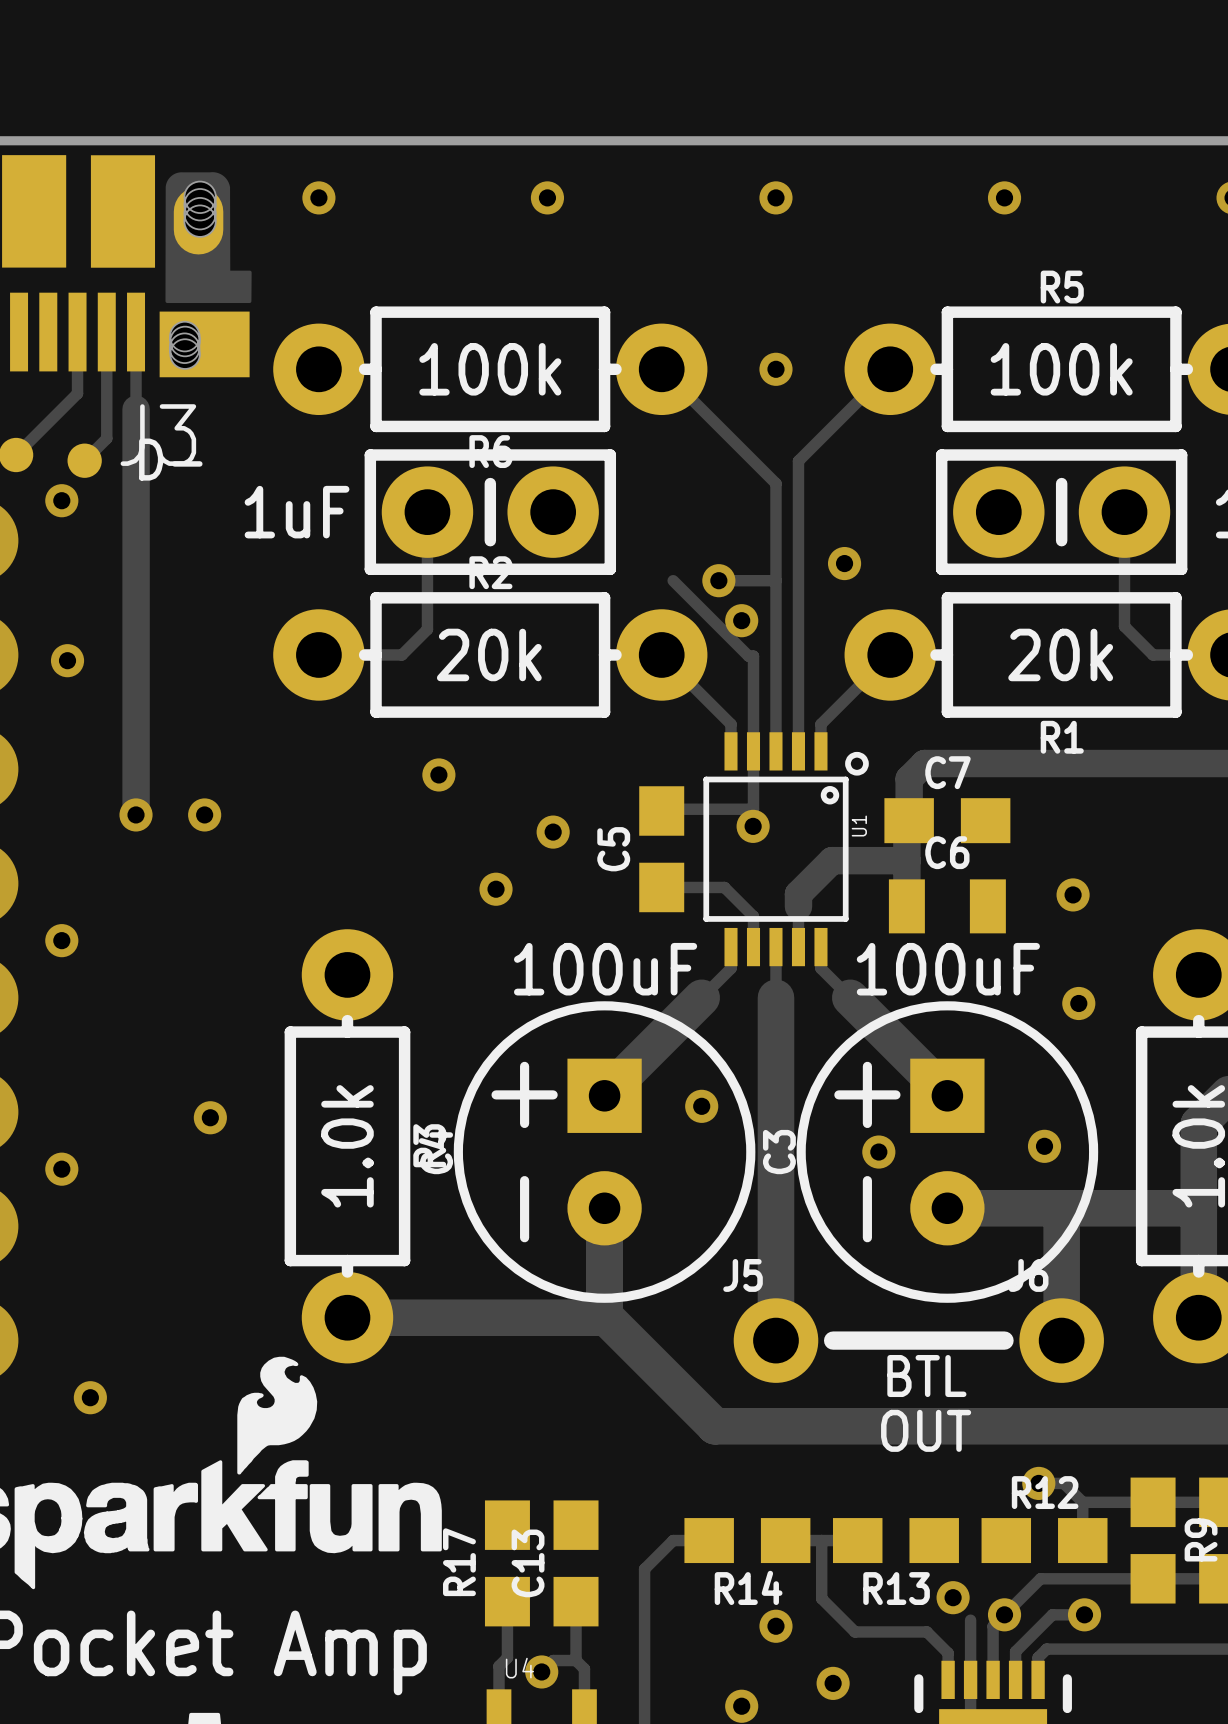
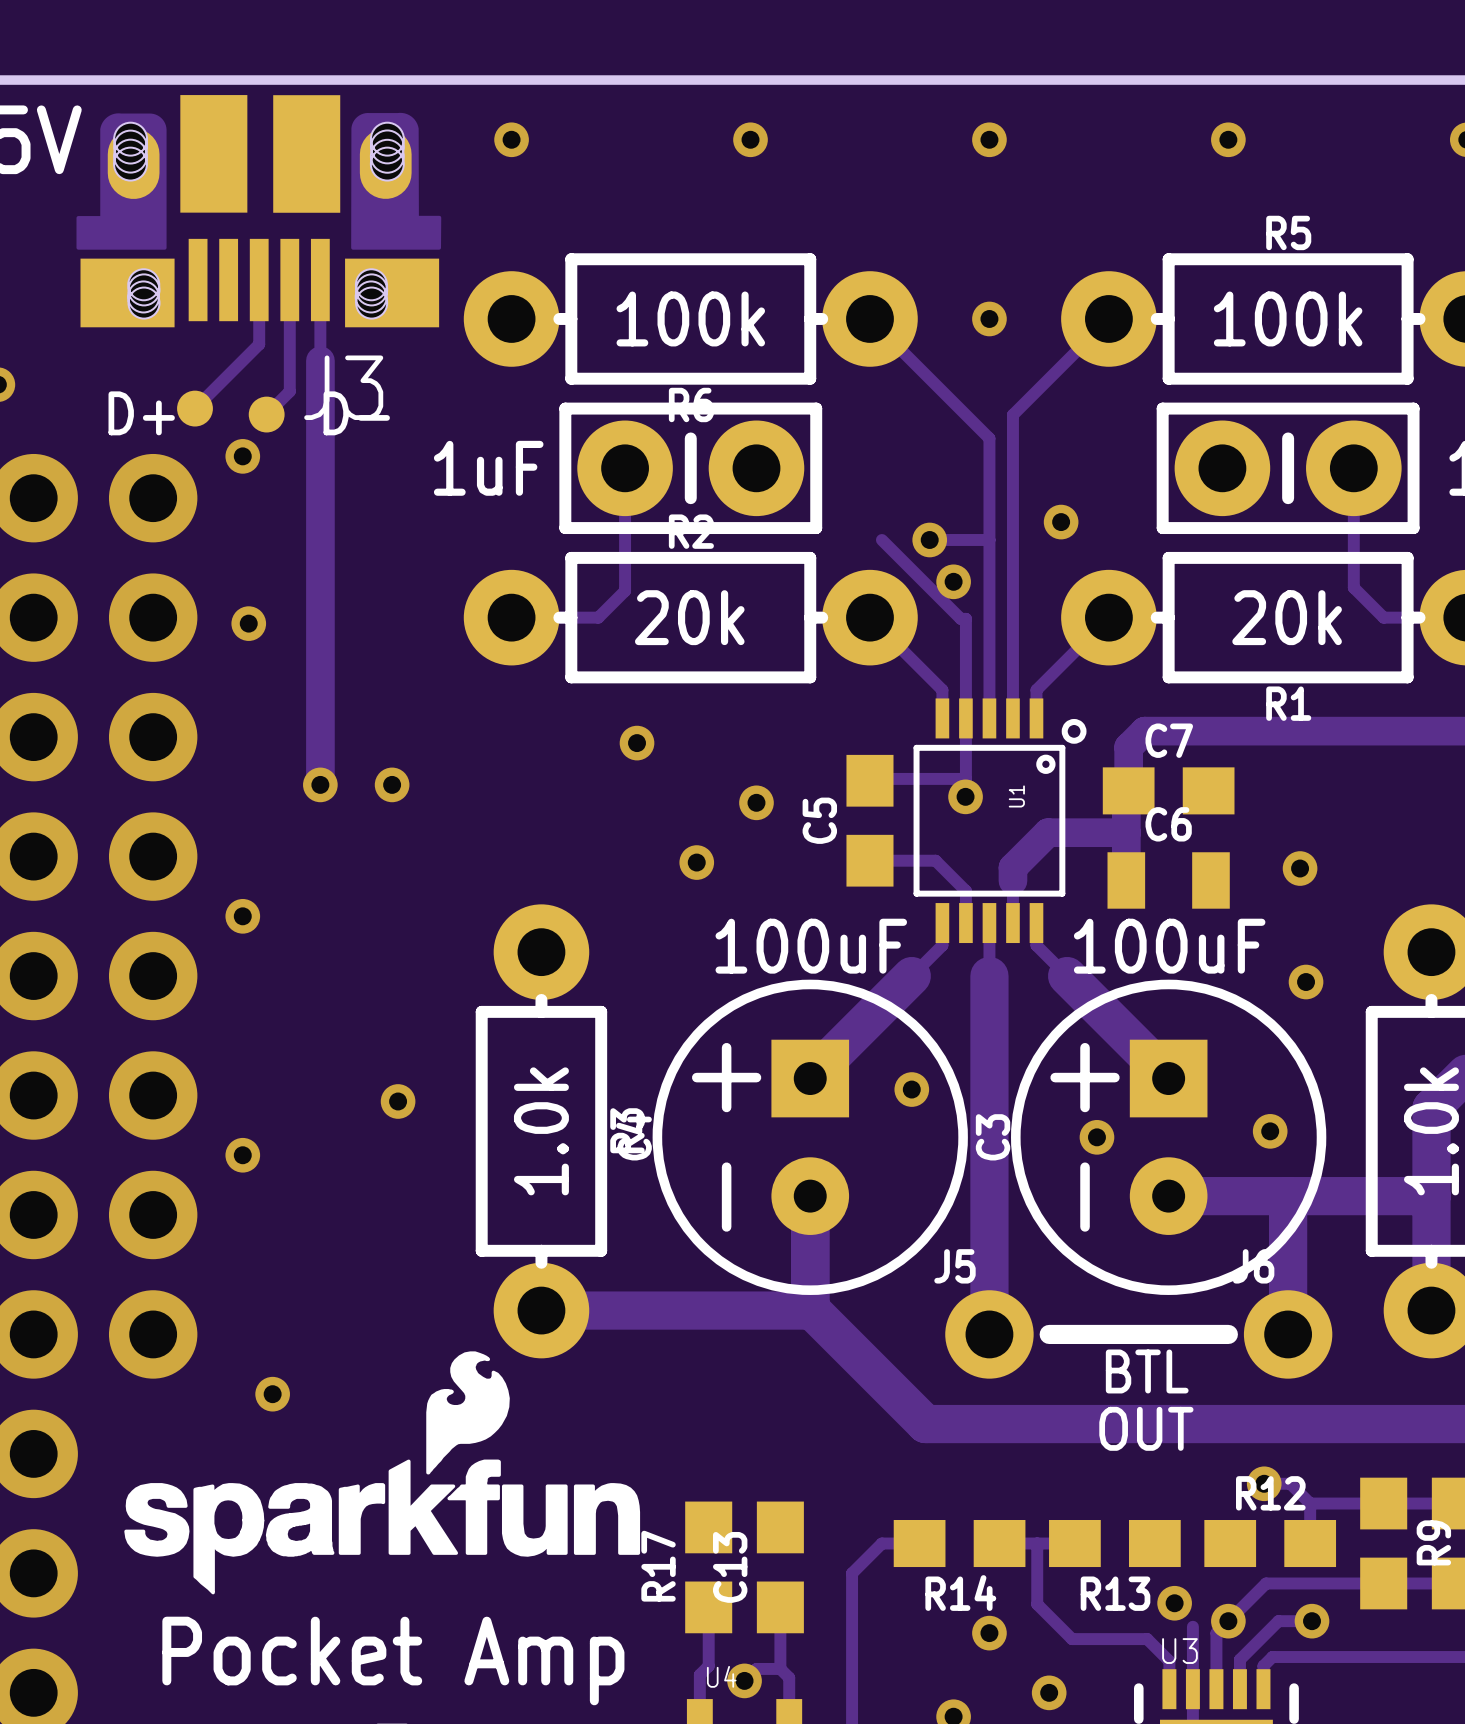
U1 name position: U1 (859, 826) -> U1 (1016, 796)
U3 name: none -> U3 (1179, 1651)

